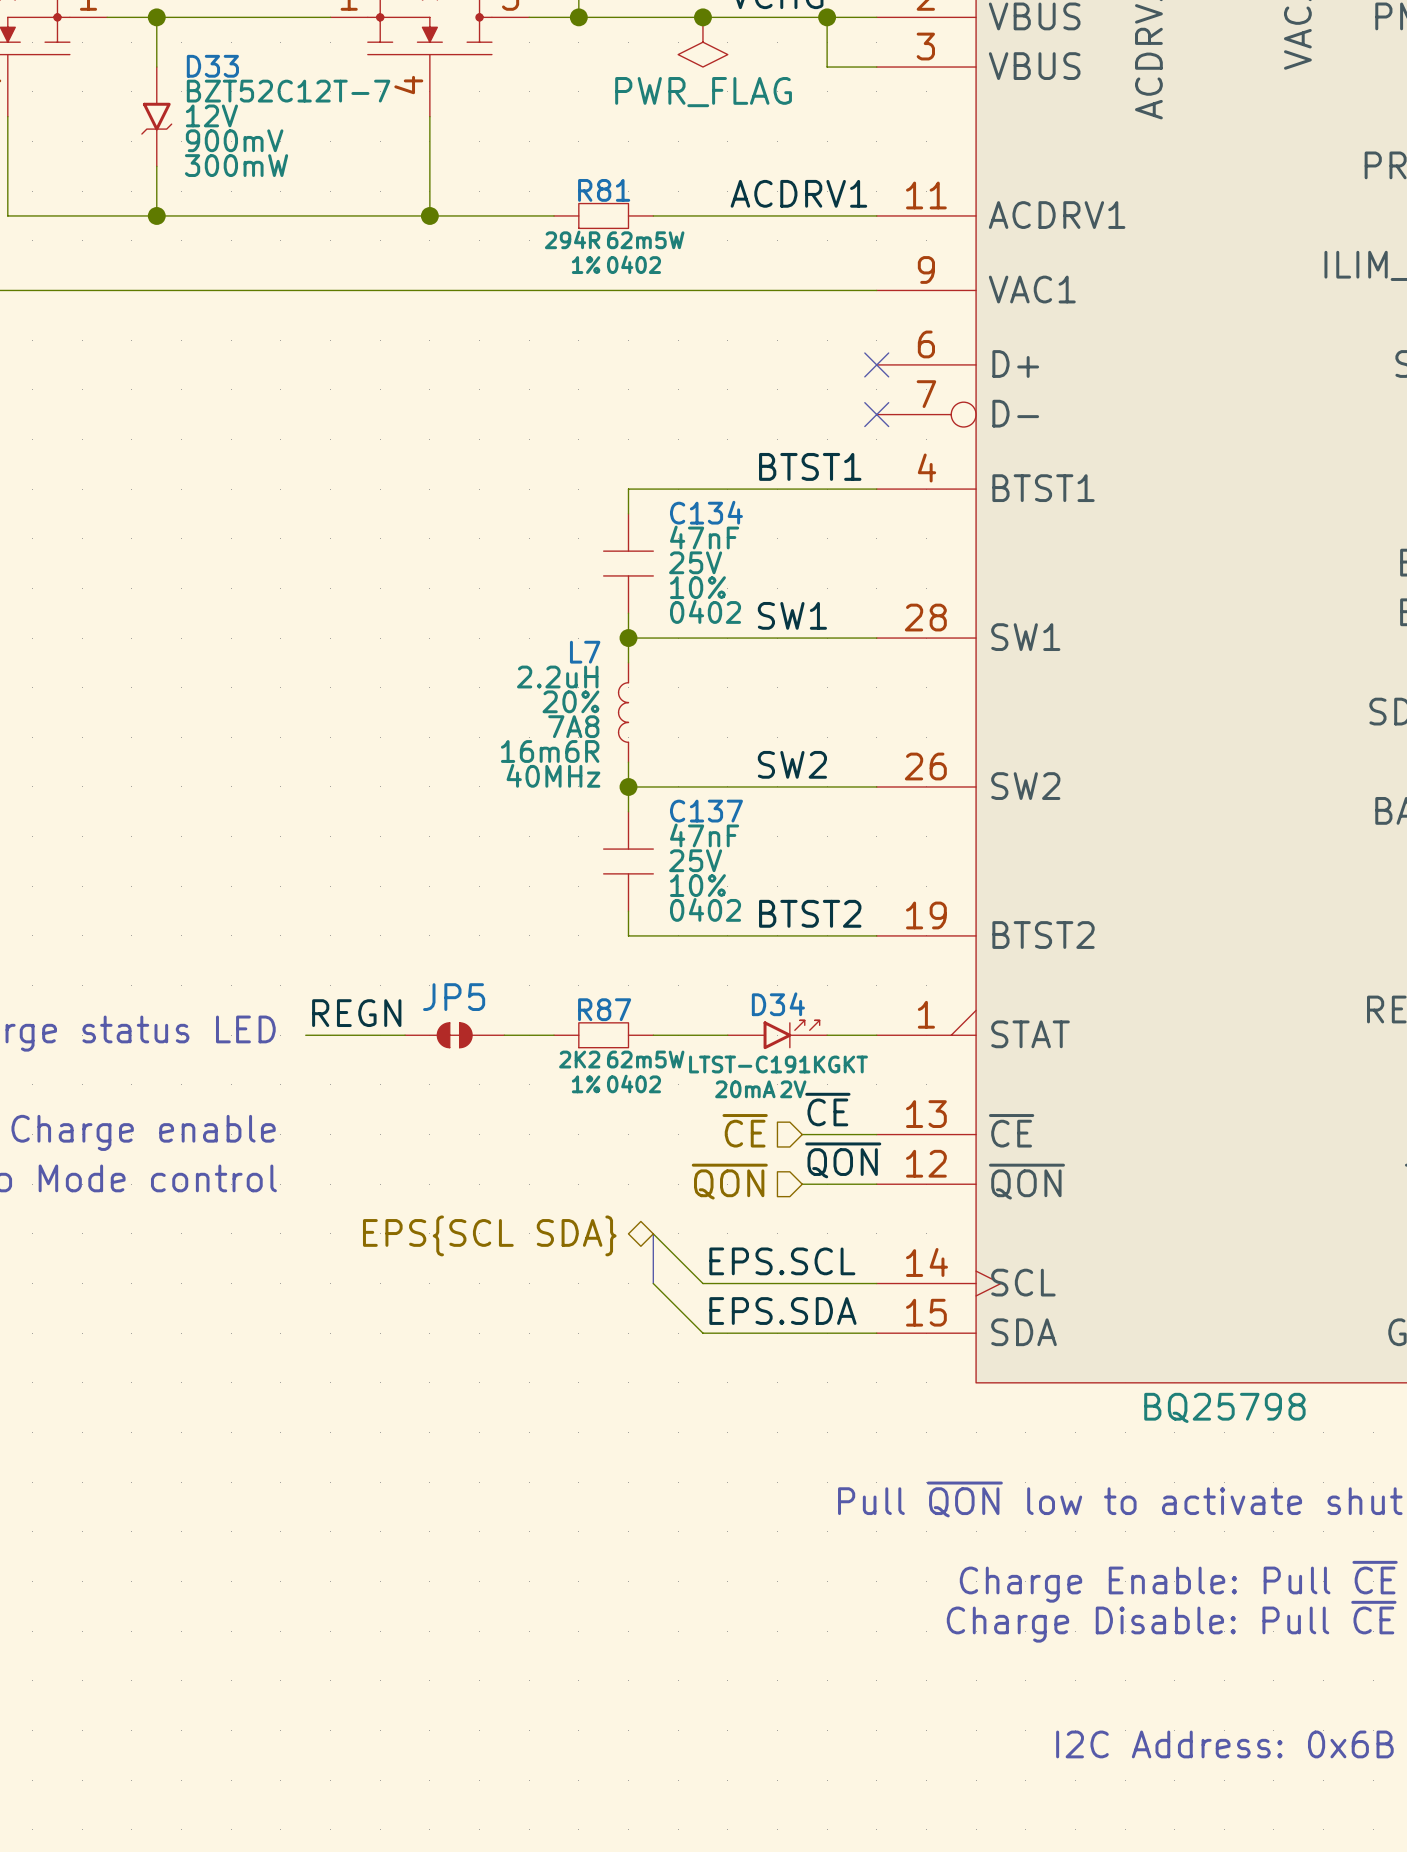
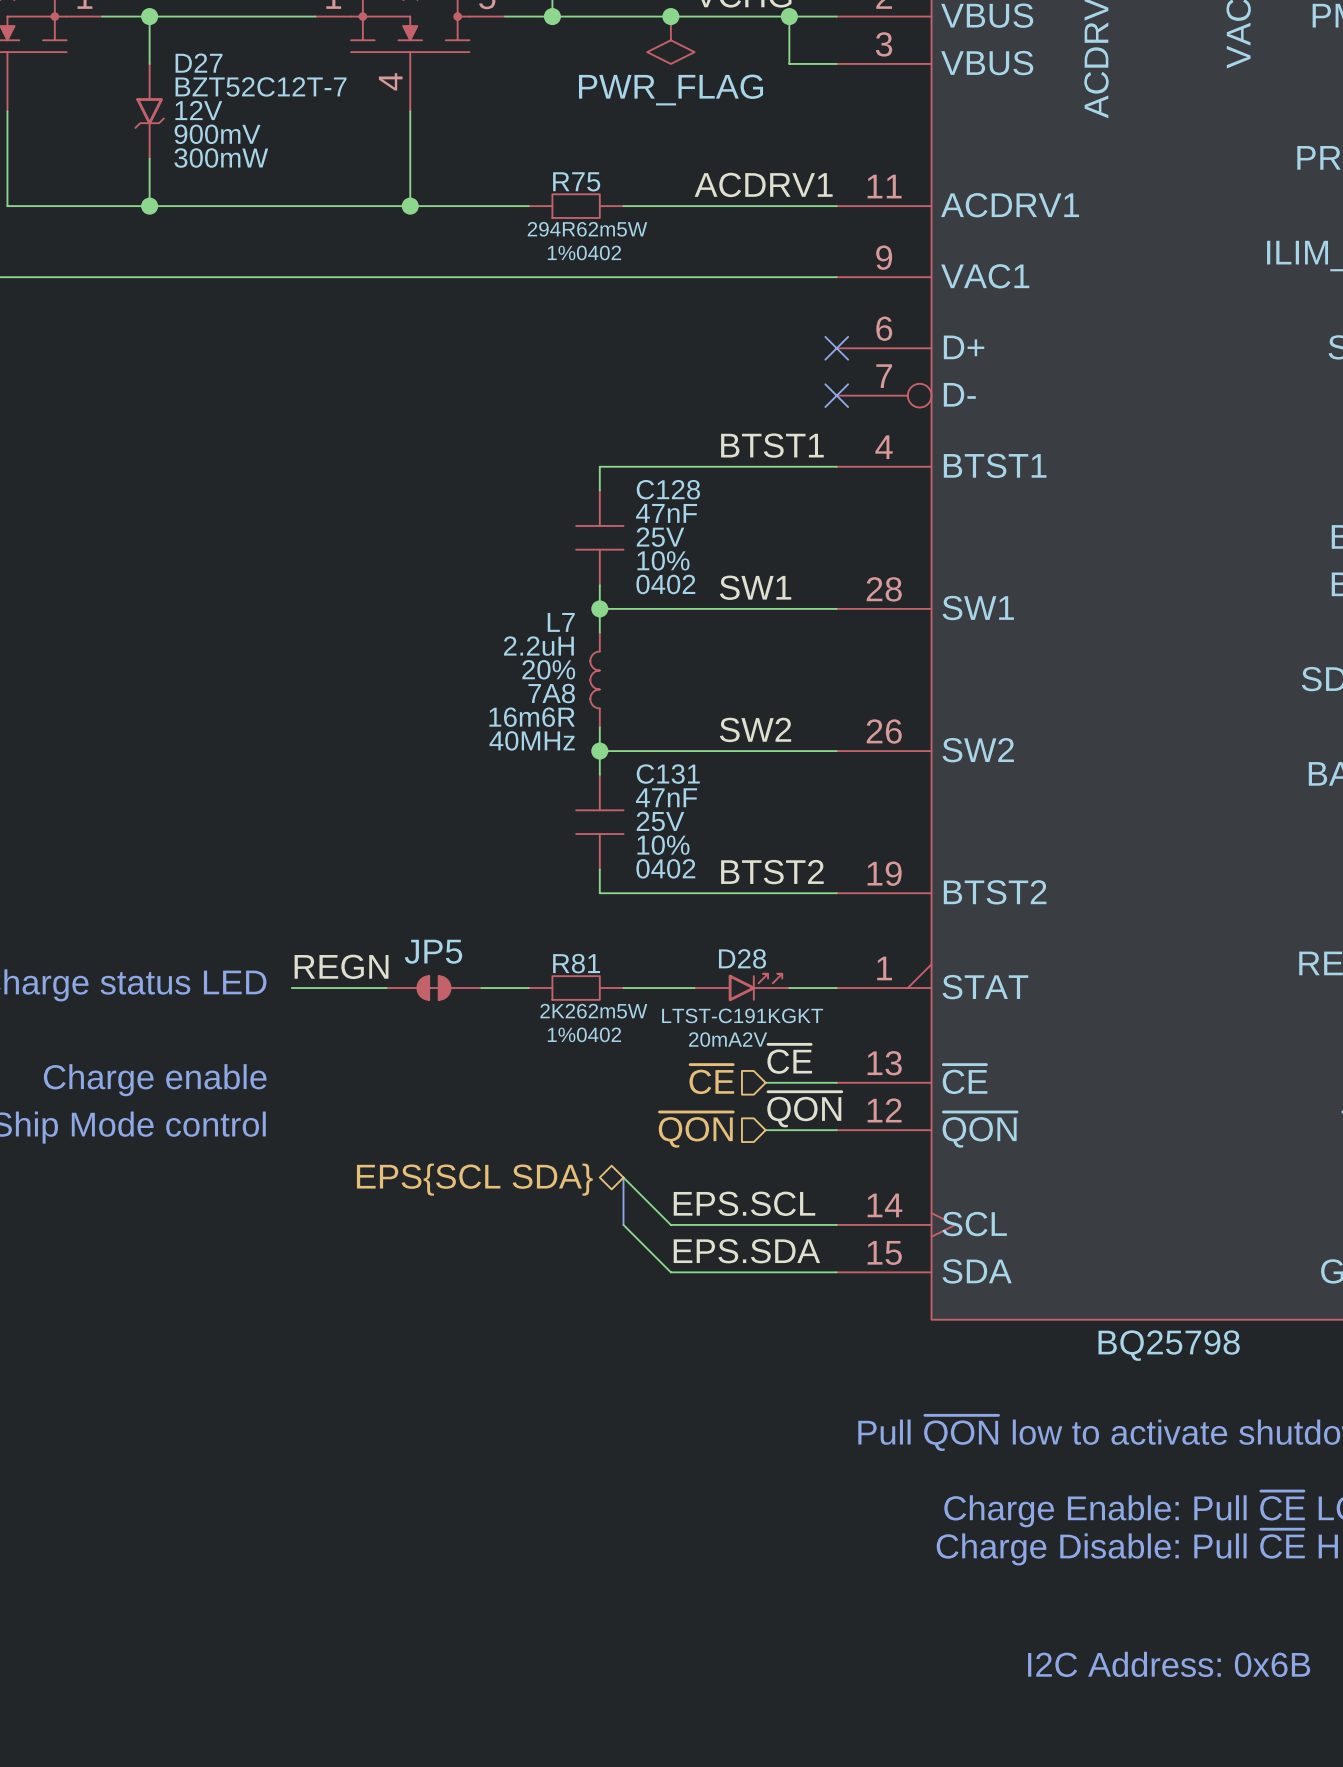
D33 name: D33 (212, 66) -> D27 (199, 63)
R81 name: R81 (604, 190) -> R75 (576, 181)
C134 name: C134 (706, 512) -> C128 (668, 489)
C137 name: C137 (706, 811) -> C131 (668, 774)
D34 name: D34 (778, 1004) -> D28 (742, 958)
R87 name: R87 (604, 1009) -> R81 (576, 963)

